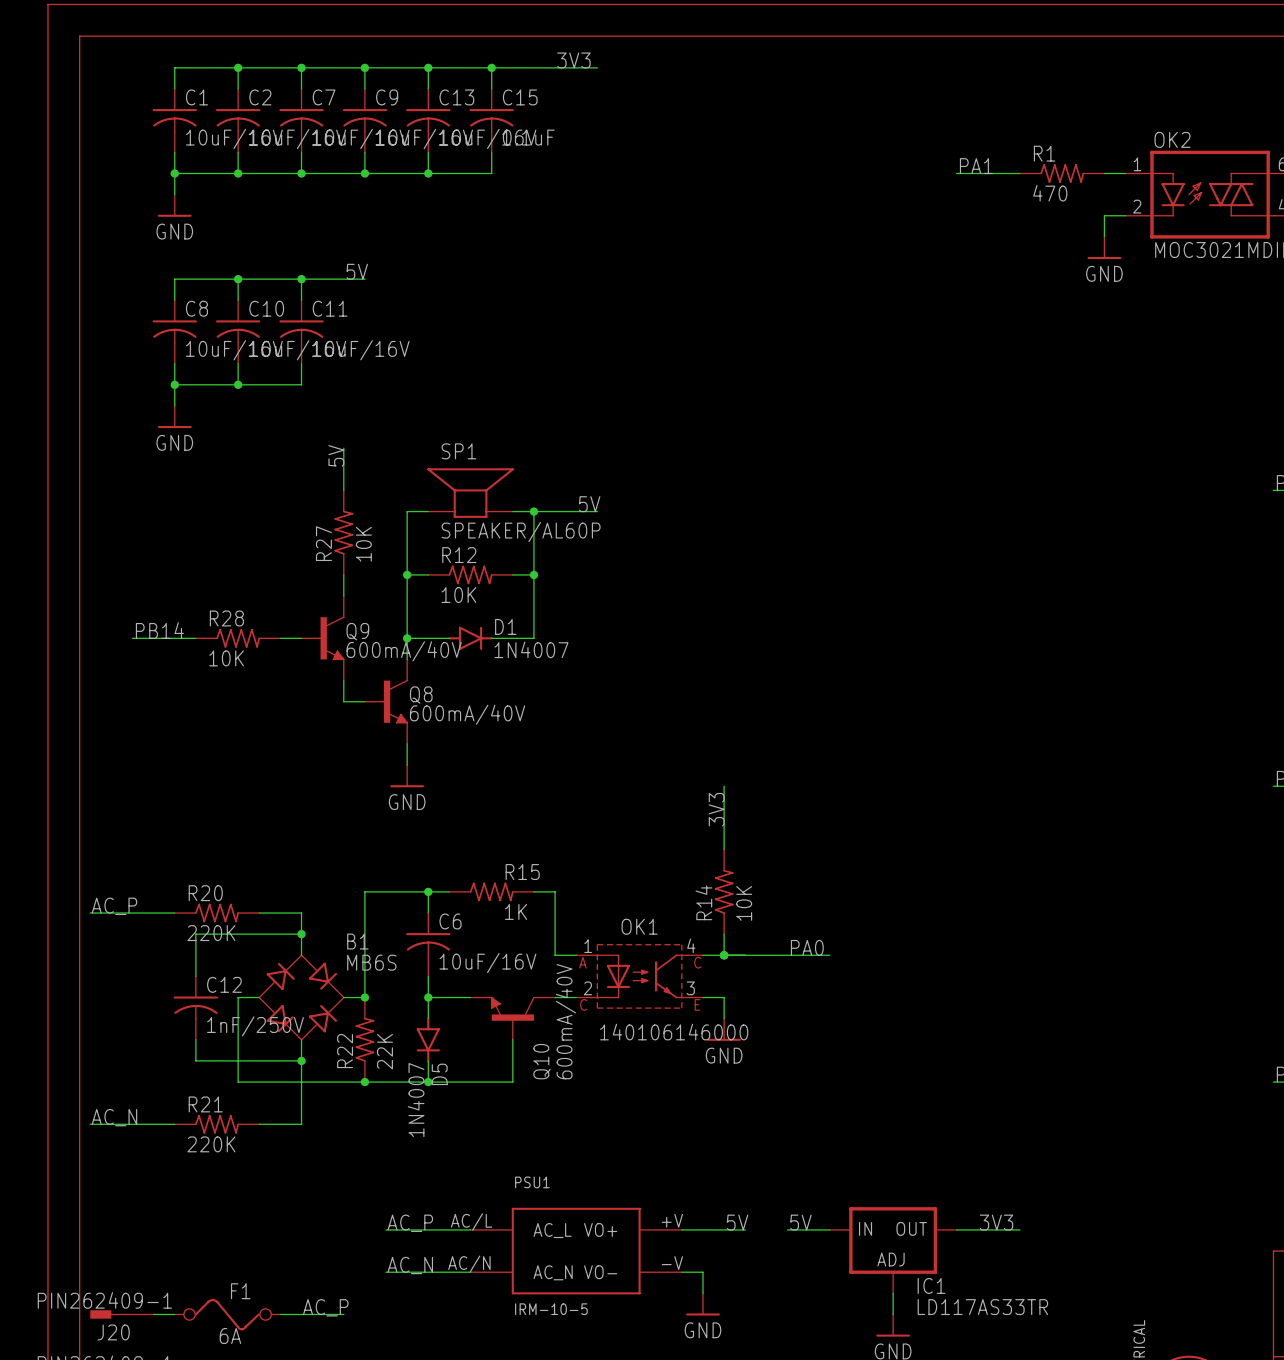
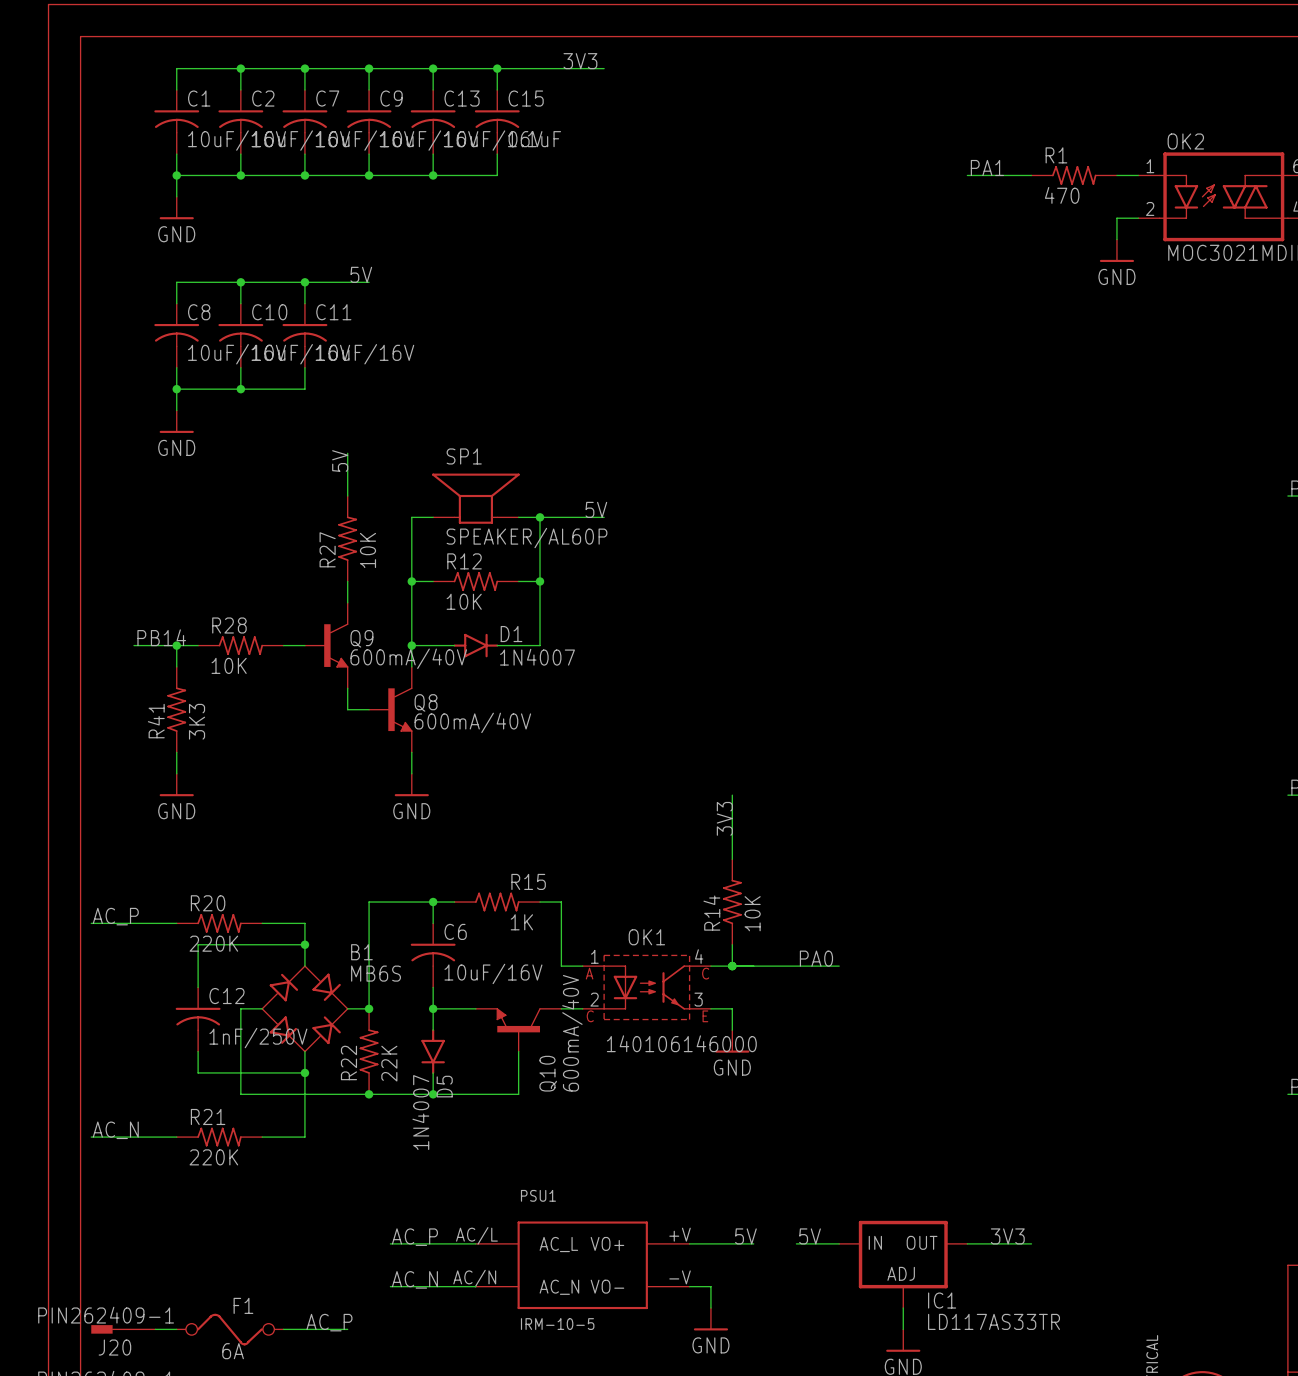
wire: none -> (176, 645) (176, 666)
junction: none -> (176, 645)
R41: none -> 3K3 (176, 709)
wire: none -> (176, 752) (176, 773)
power symbol: none -> GND (176, 785)

